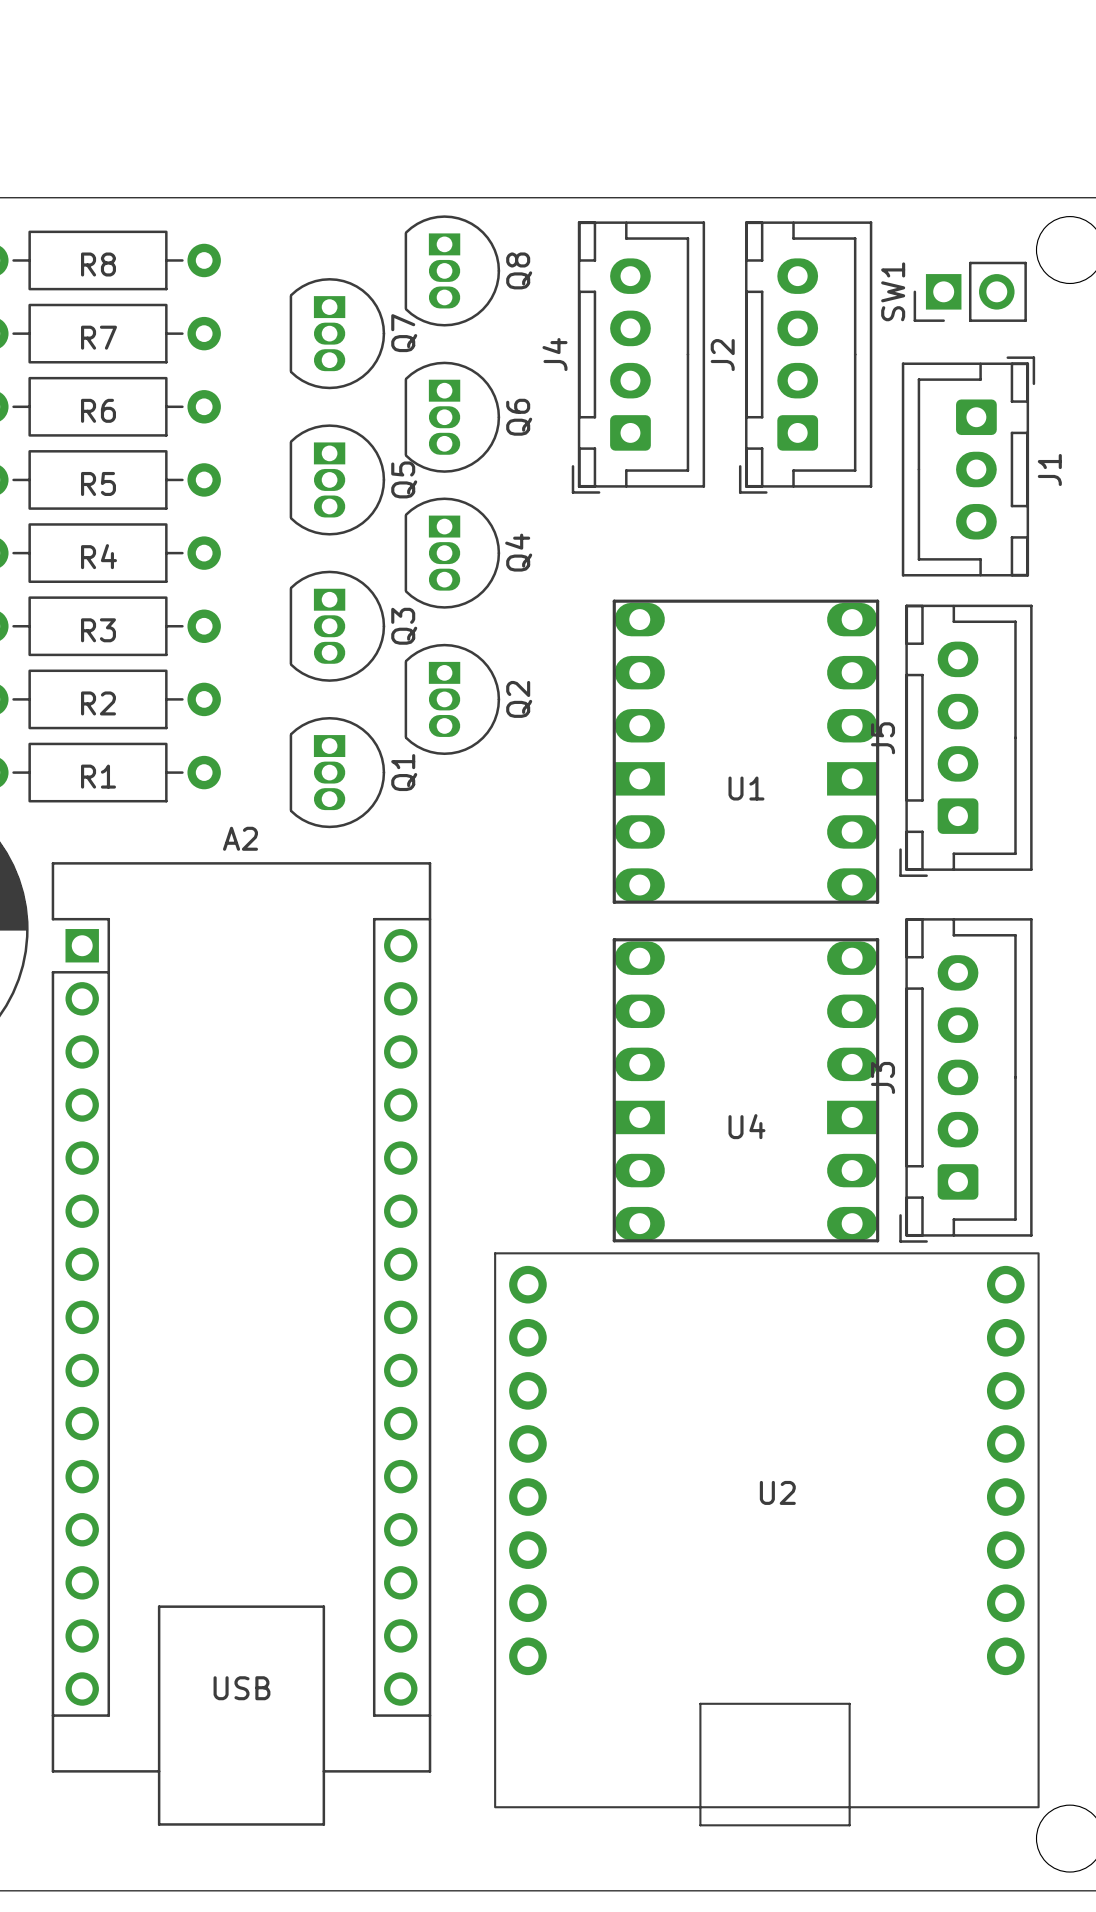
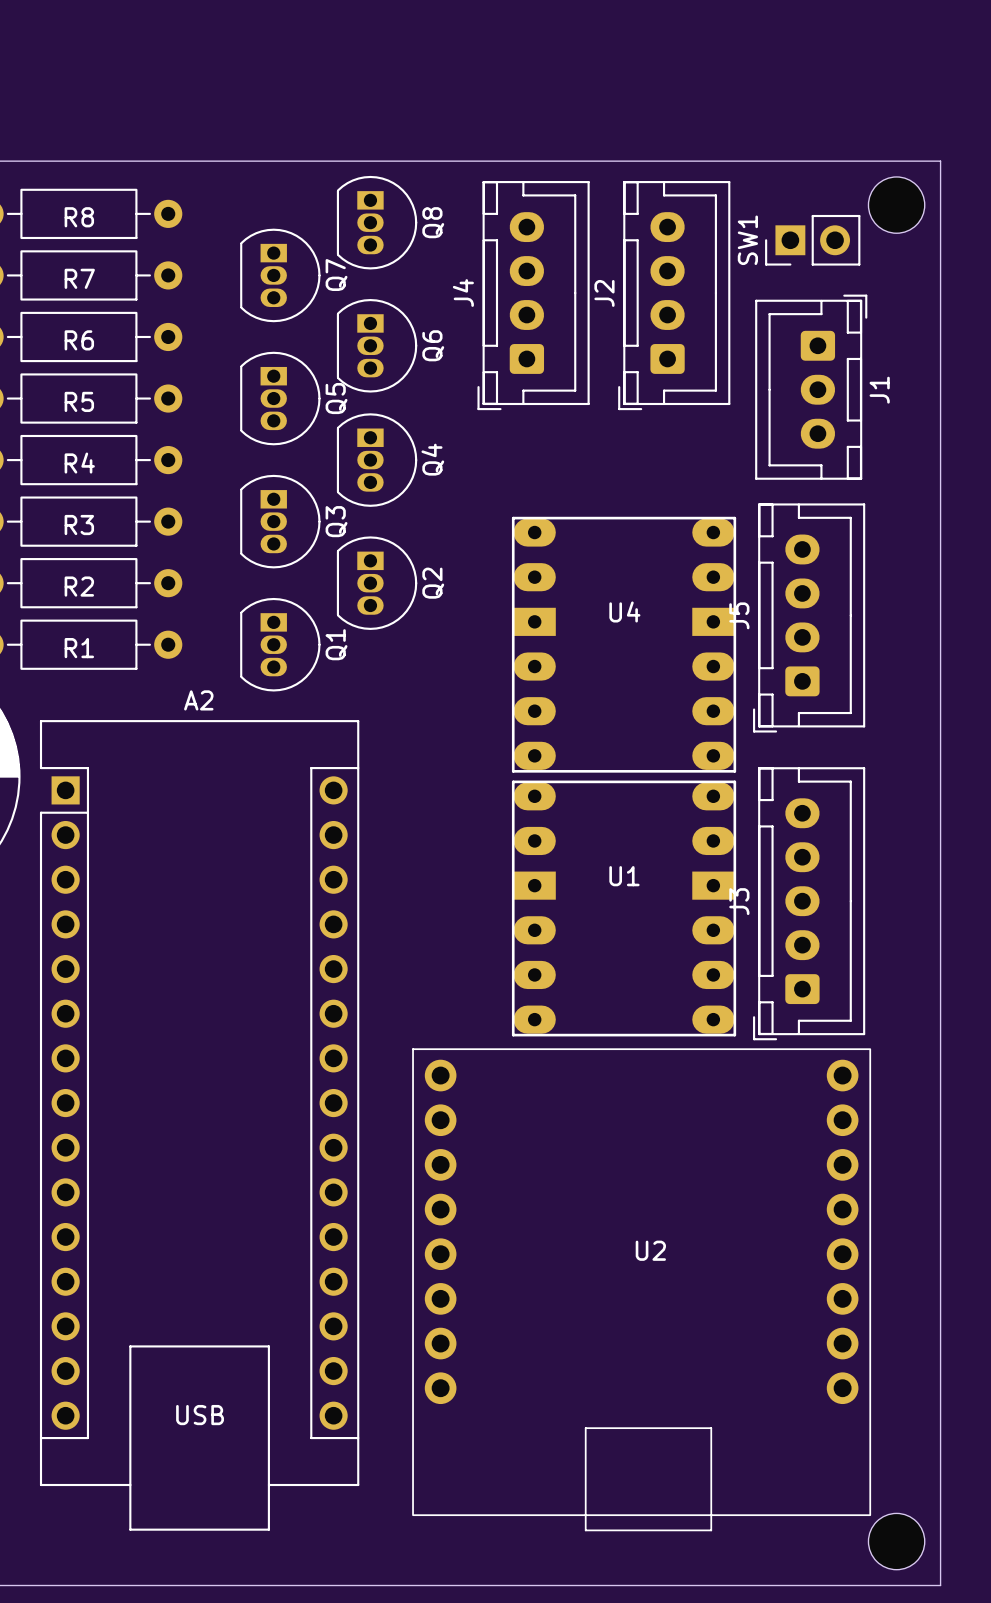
U1 footprint: [612, 599, 880, 904] -> [511, 780, 737, 1037]
U1 name position: U1 (746, 788) -> U1 (624, 876)
U4 footprint: [612, 938, 880, 1243] -> [511, 516, 737, 773]
U4 name position: U4 (746, 1126) -> U4 (624, 611)

